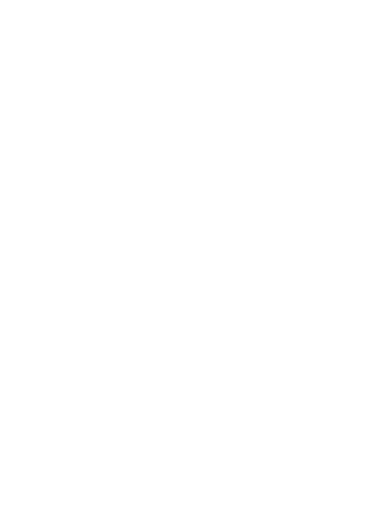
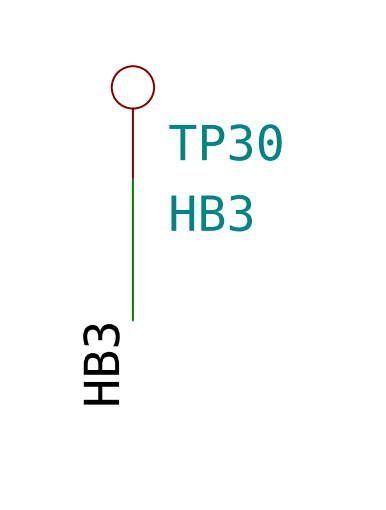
TP30: none -> HB3 (132, 122)
wire: none -> (132, 179) (132, 320)
label: none -> HB3 (101, 364)

